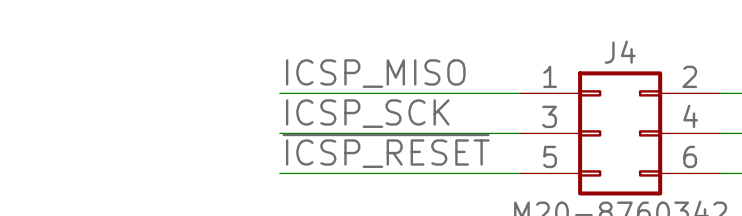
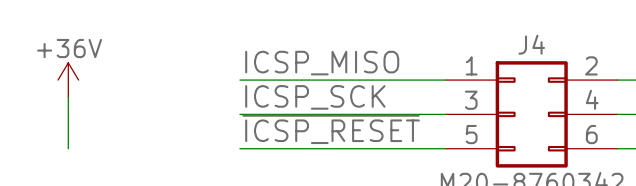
power symbol: none -> +36V (68, 80)
wire: none -> (68, 97) (68, 148)

